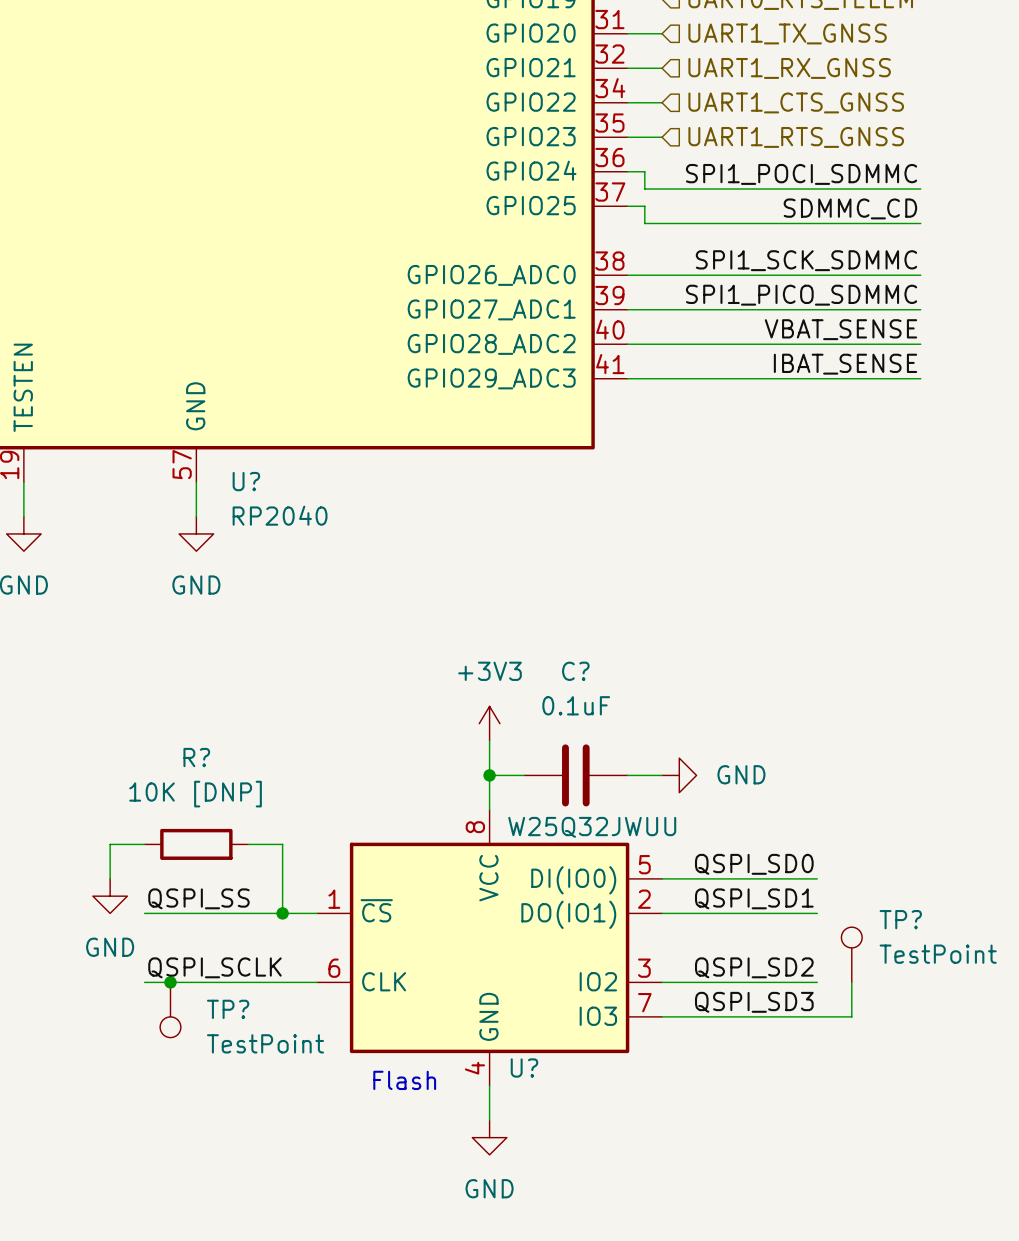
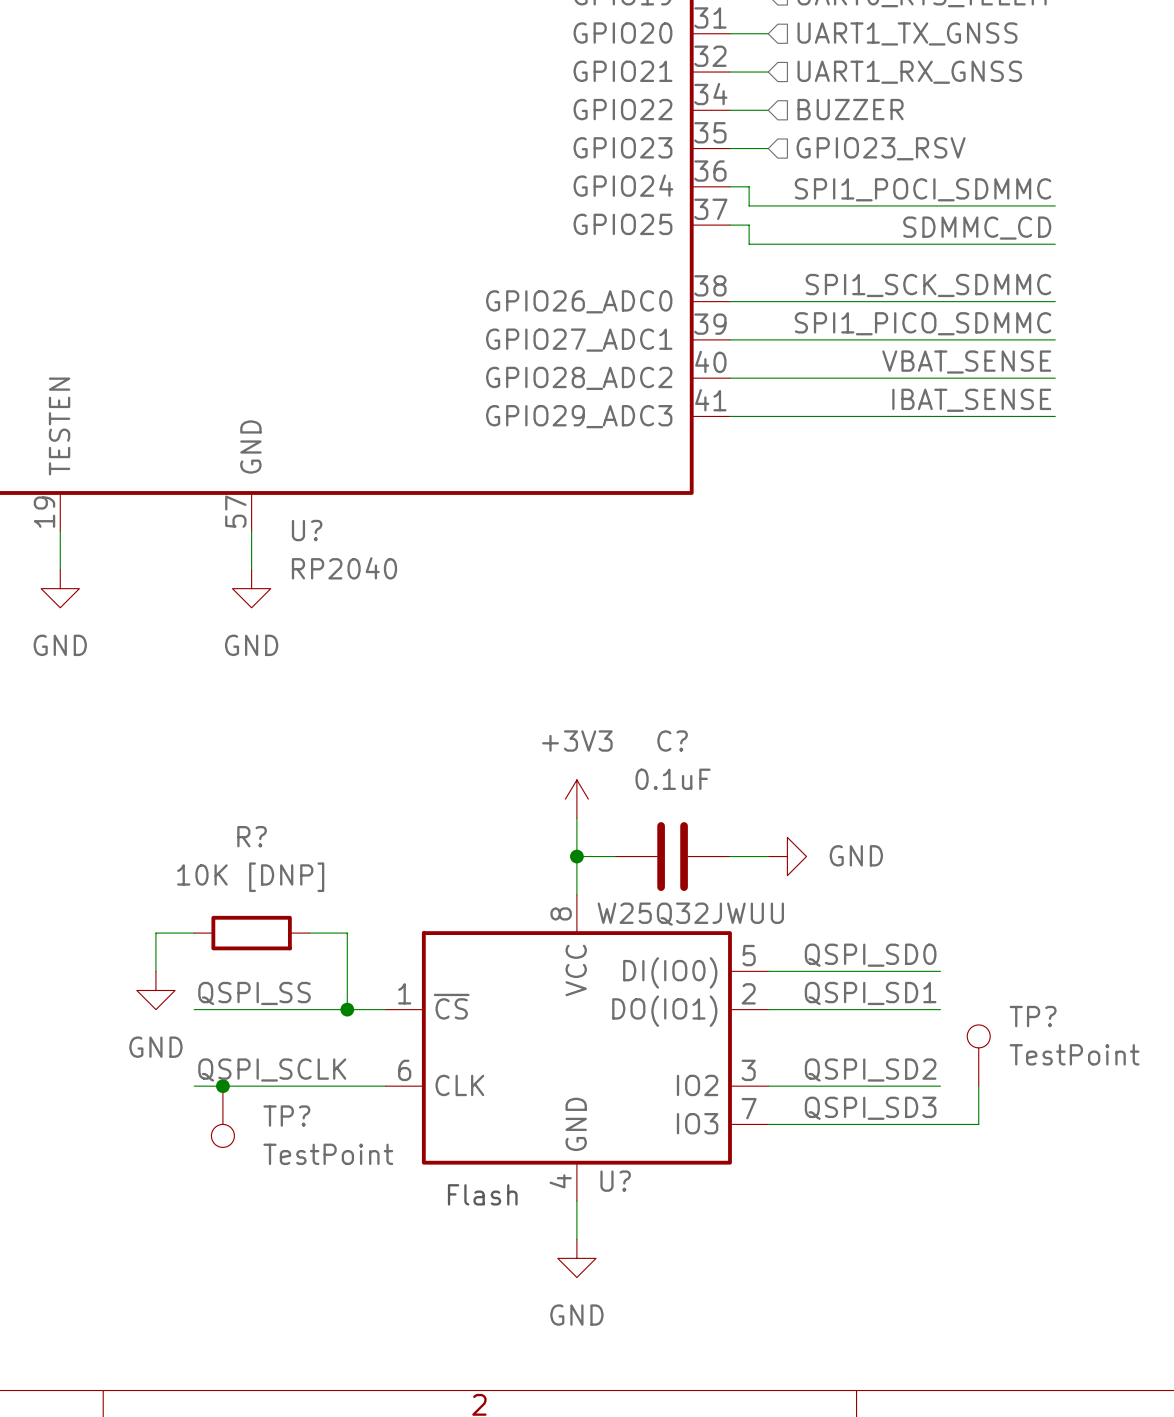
hierarchical label: UART1_CTS_GNSS (796, 102) -> BUZZER (850, 109)
hierarchical label: UART1_RTS_GNSS (796, 137) -> GPIO23_RSV (881, 148)

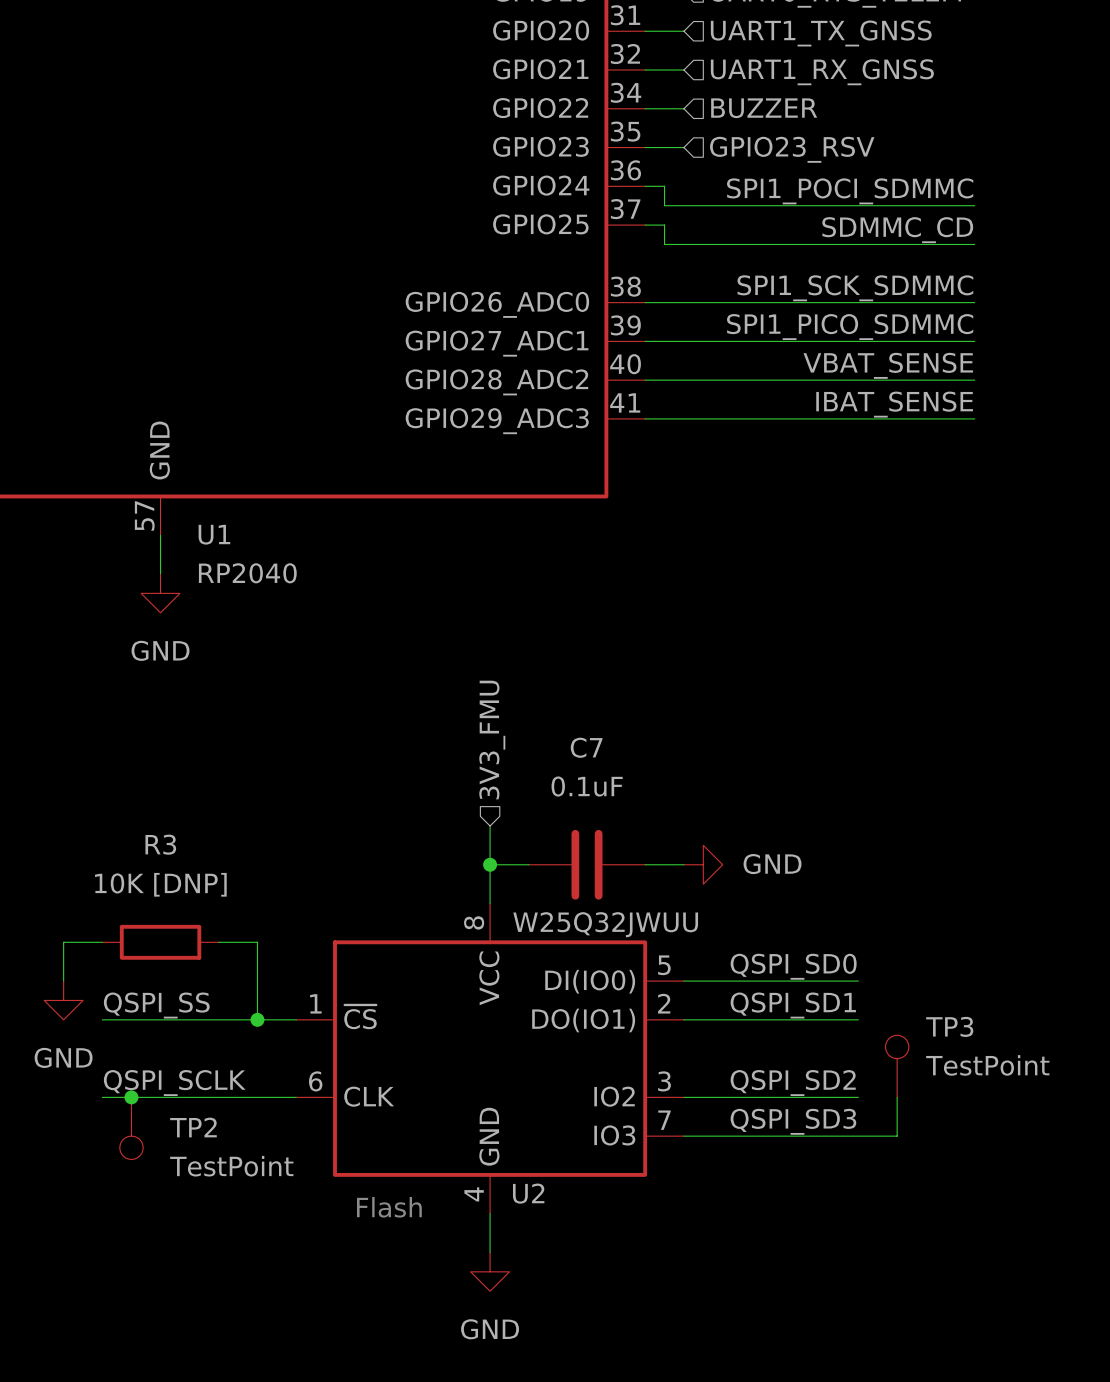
U? name: U? (307, 530) -> U1 (214, 534)
hierarchical label: none -> 3V3_FMU (492, 740)
C? name: C? (672, 741) -> C7 (586, 747)
power symbol: +3V3 (576, 799) -> none
R? name: R? (252, 836) -> R3 (160, 844)
TP? name: TP? (1033, 1016) -> TP3 (949, 1026)
TP? name: TP? (286, 1116) -> TP2 (193, 1127)
U? name: U? (615, 1181) -> U2 (528, 1193)

